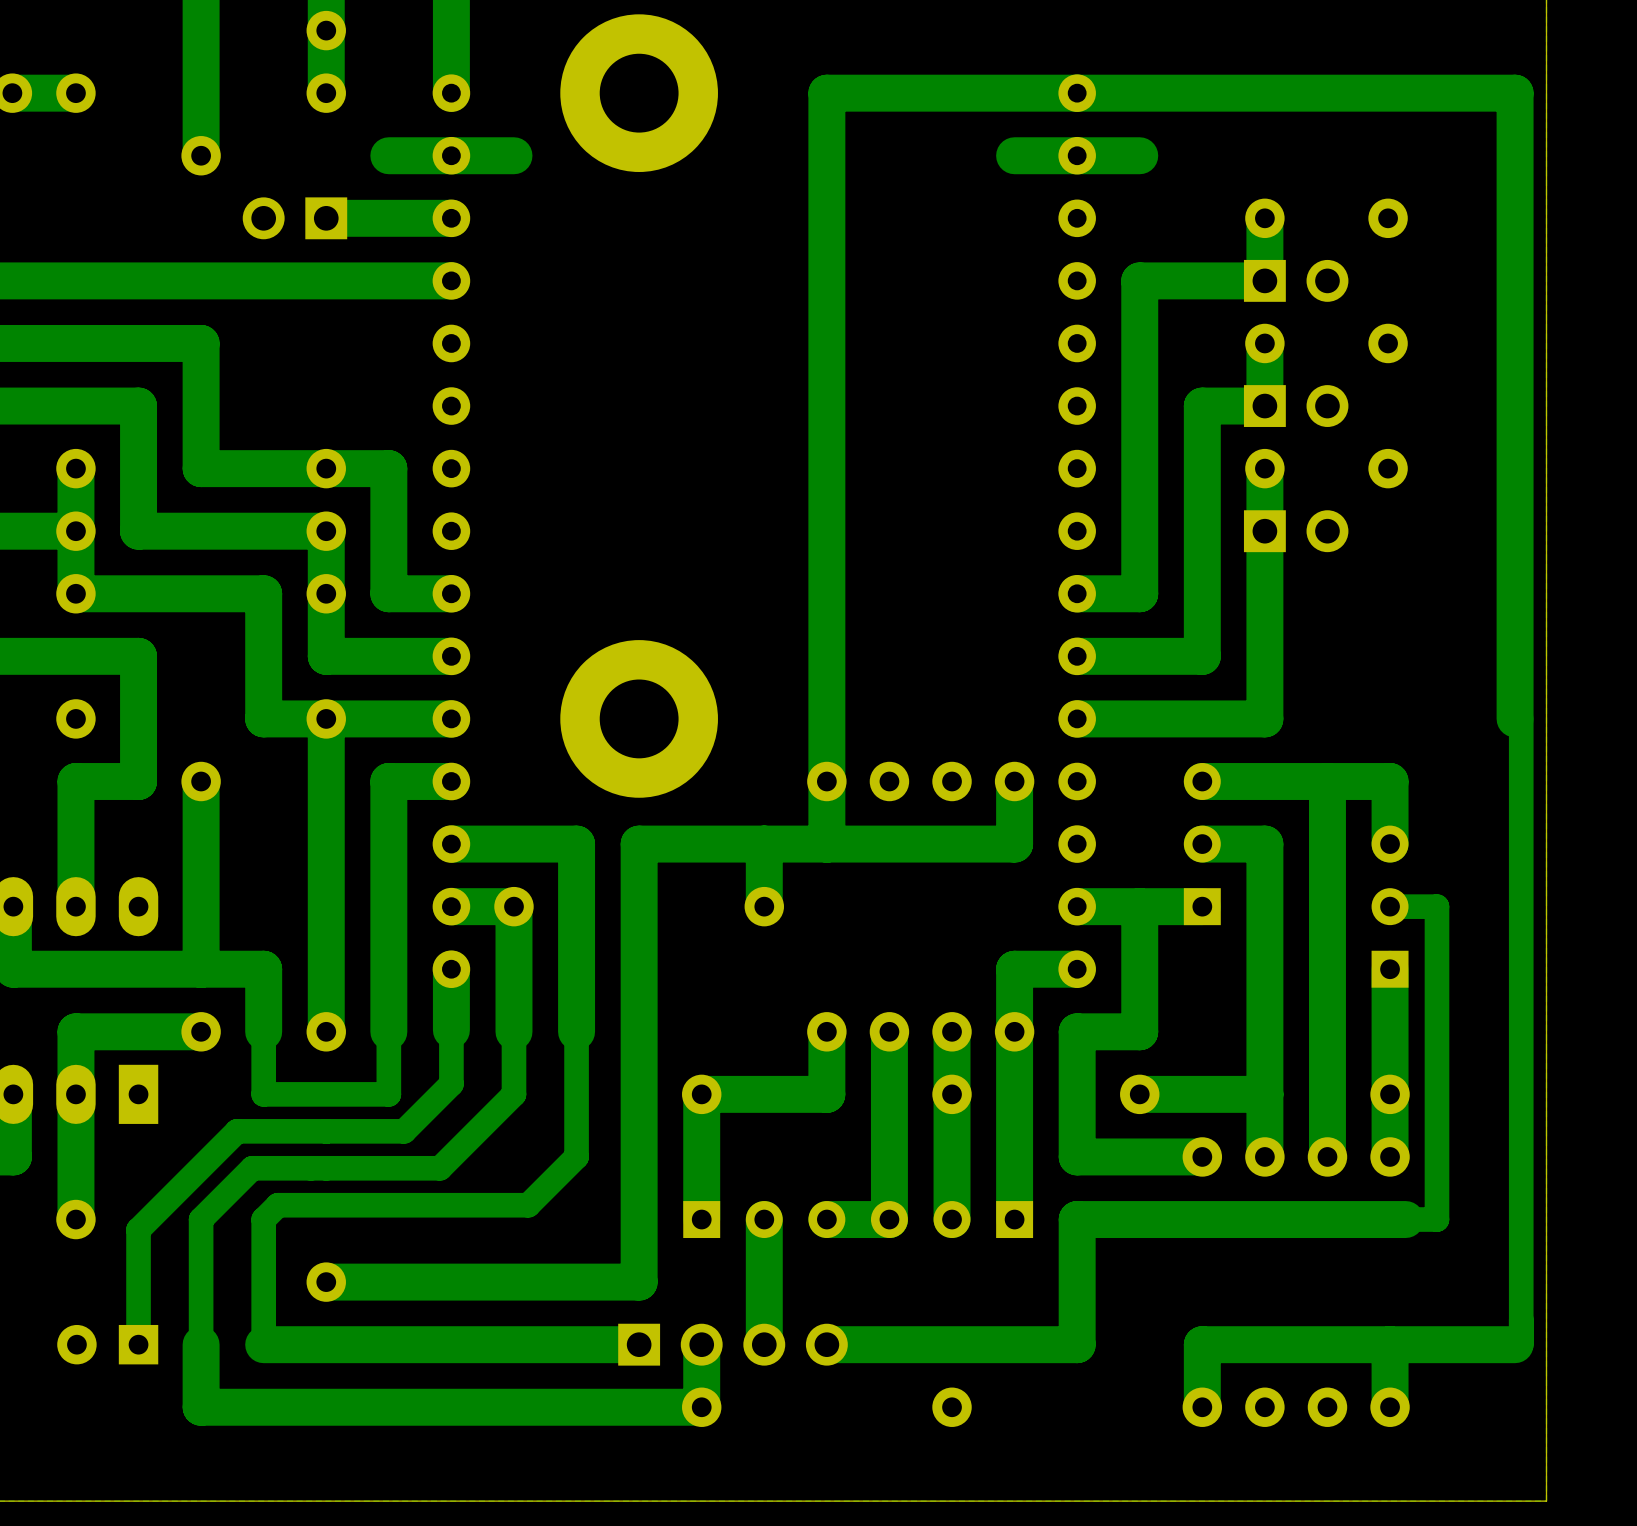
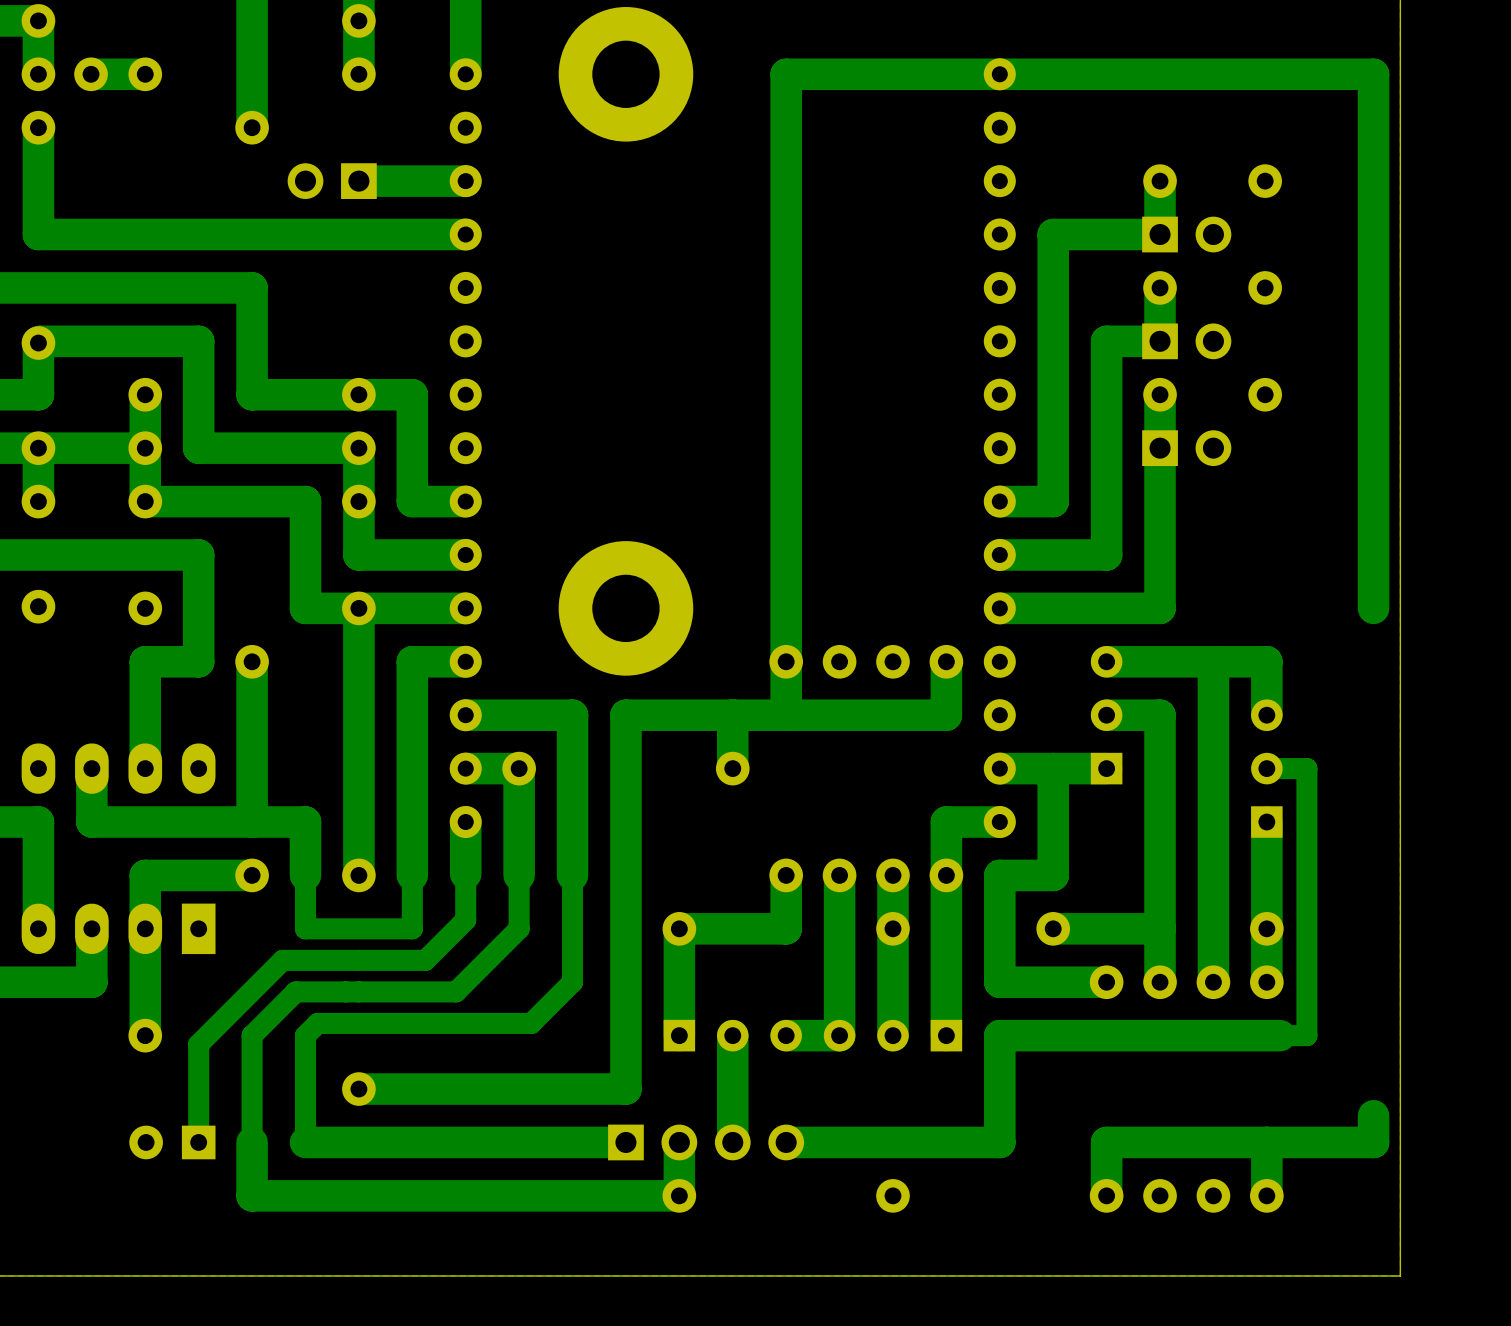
track: (513, 155) (388, 155) -> none
track: (1139, 155) (1014, 155) -> none
track: (1521, 718) (1521, 1344) -> none
track: none -> (1373, 1115) (1373, 1142)

